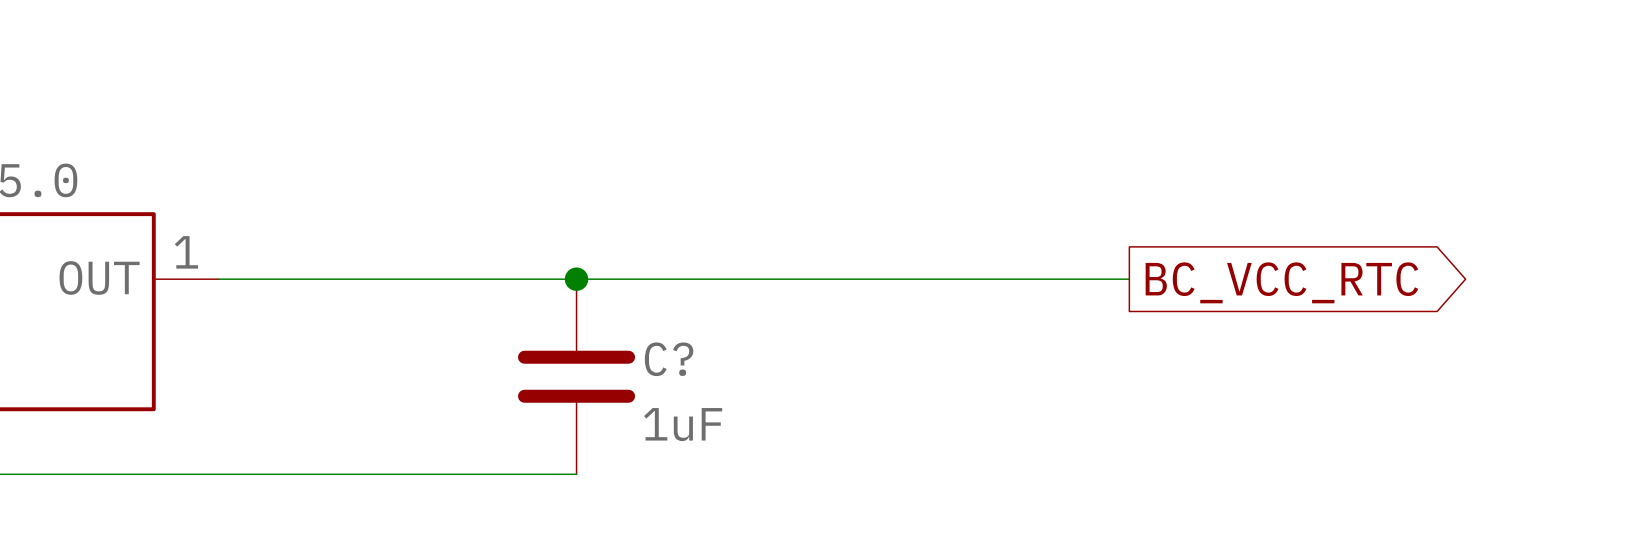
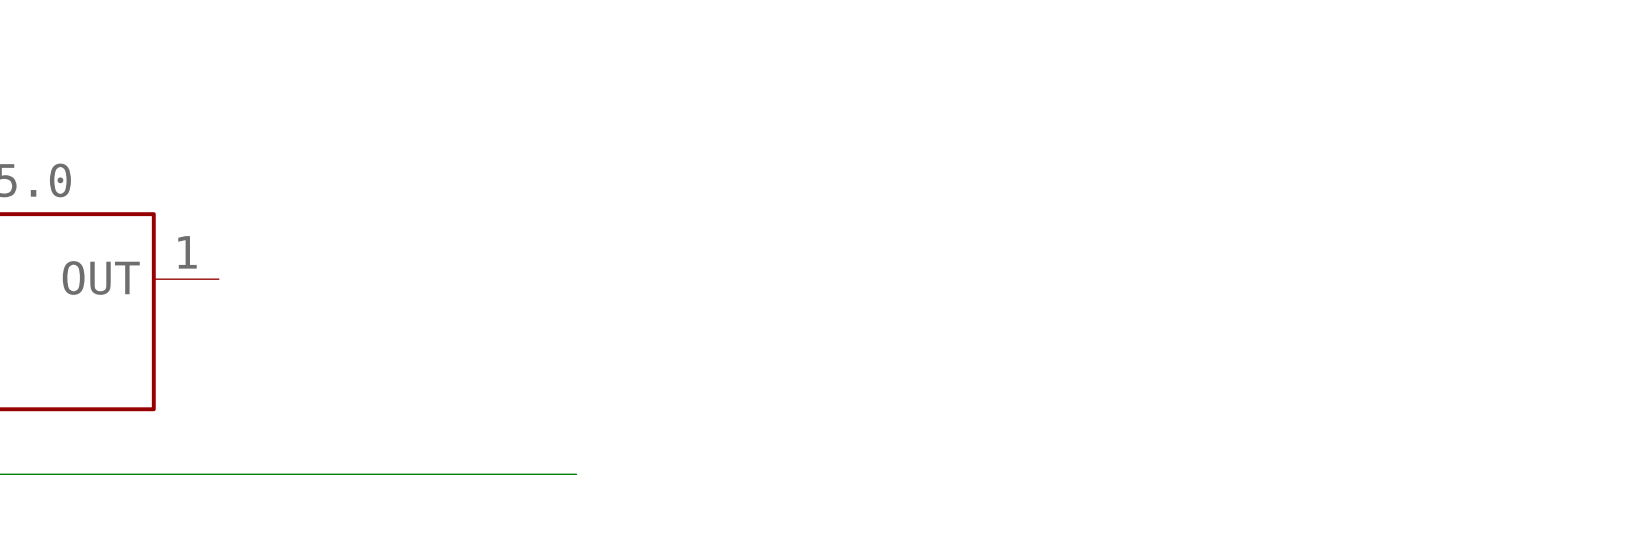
wire: (218, 279) (1129, 279) -> none
junction: (576, 279) -> none
global label: BC_VCC_RTC (1281, 282) -> none
C?: 1uF (576, 376) -> none

